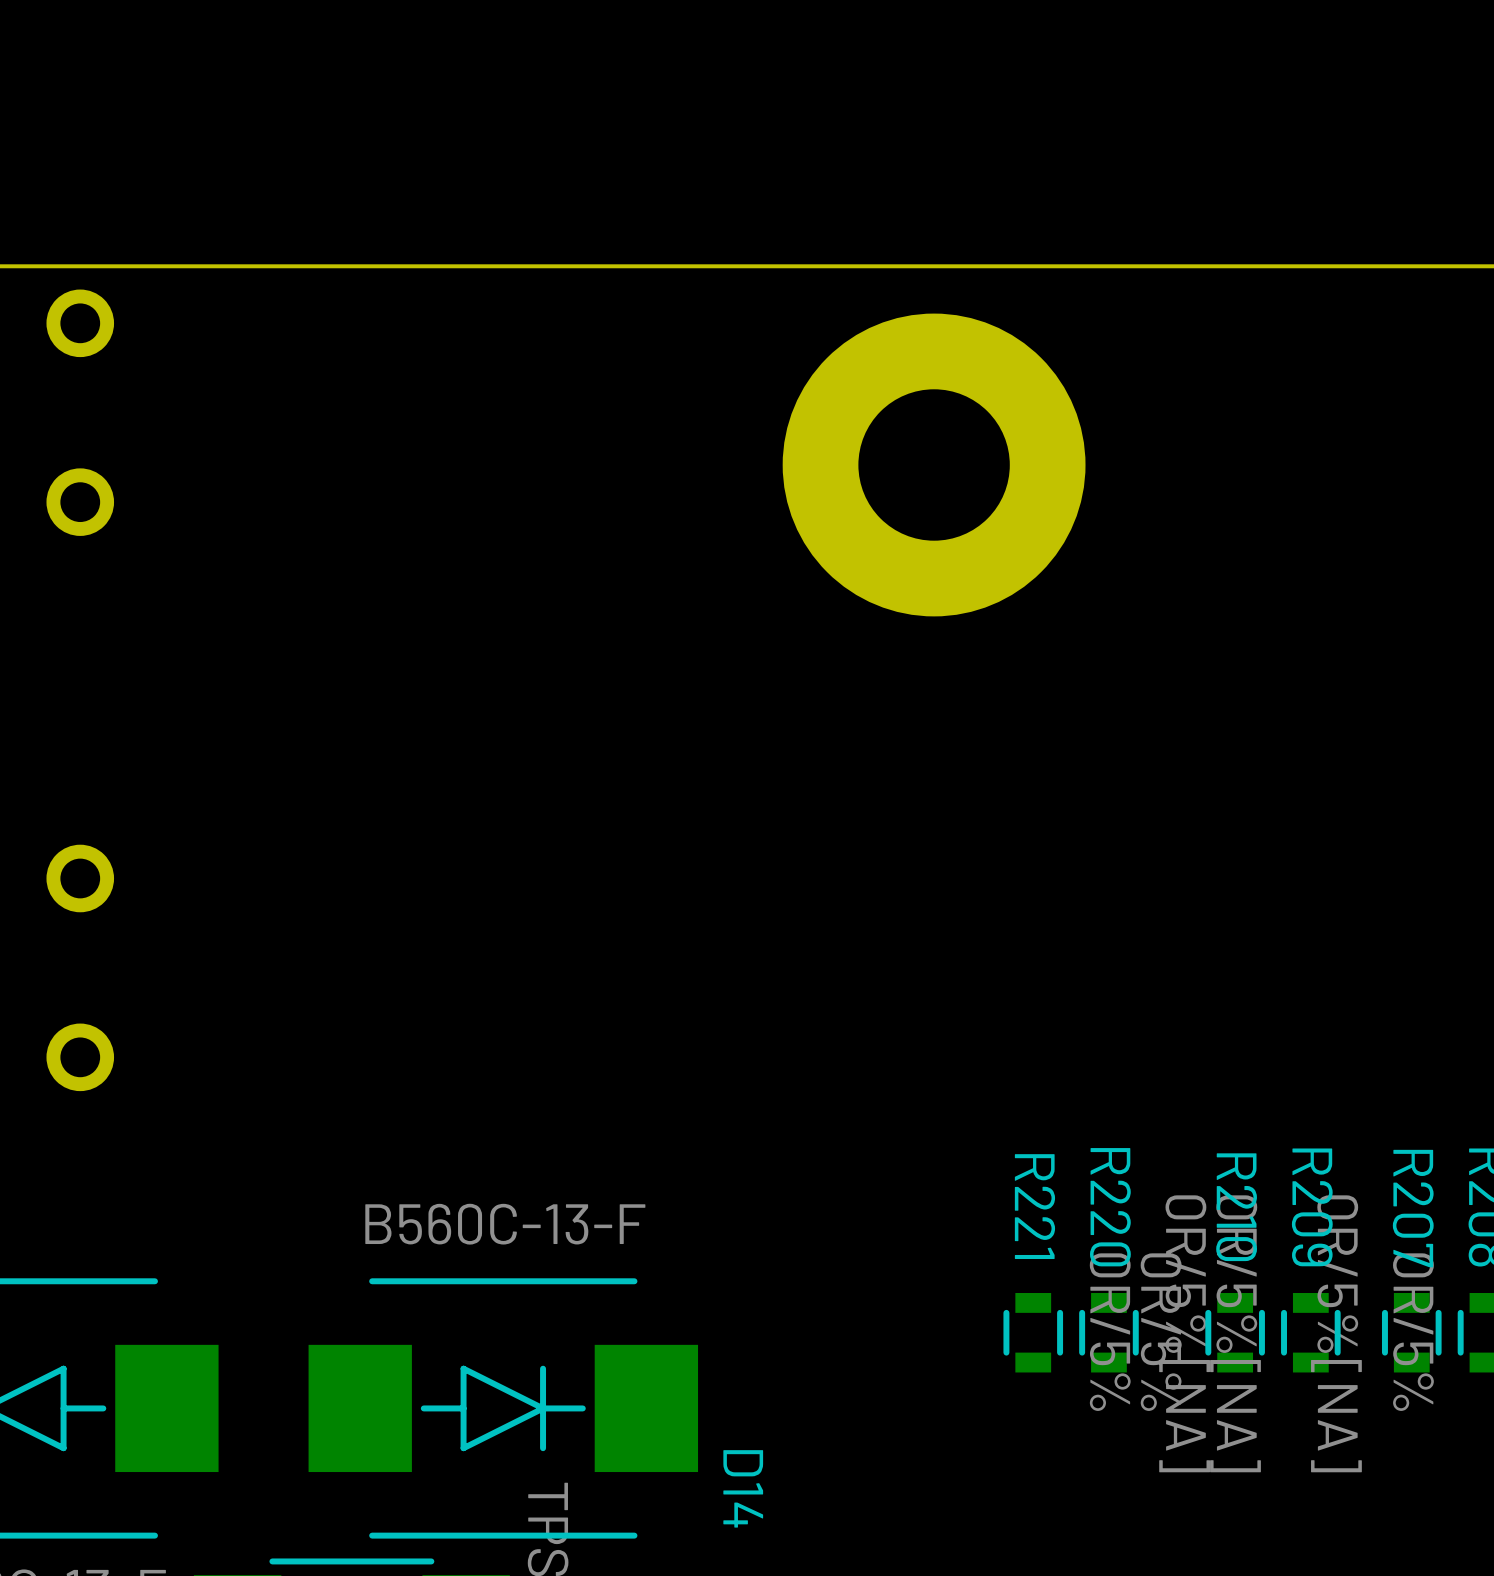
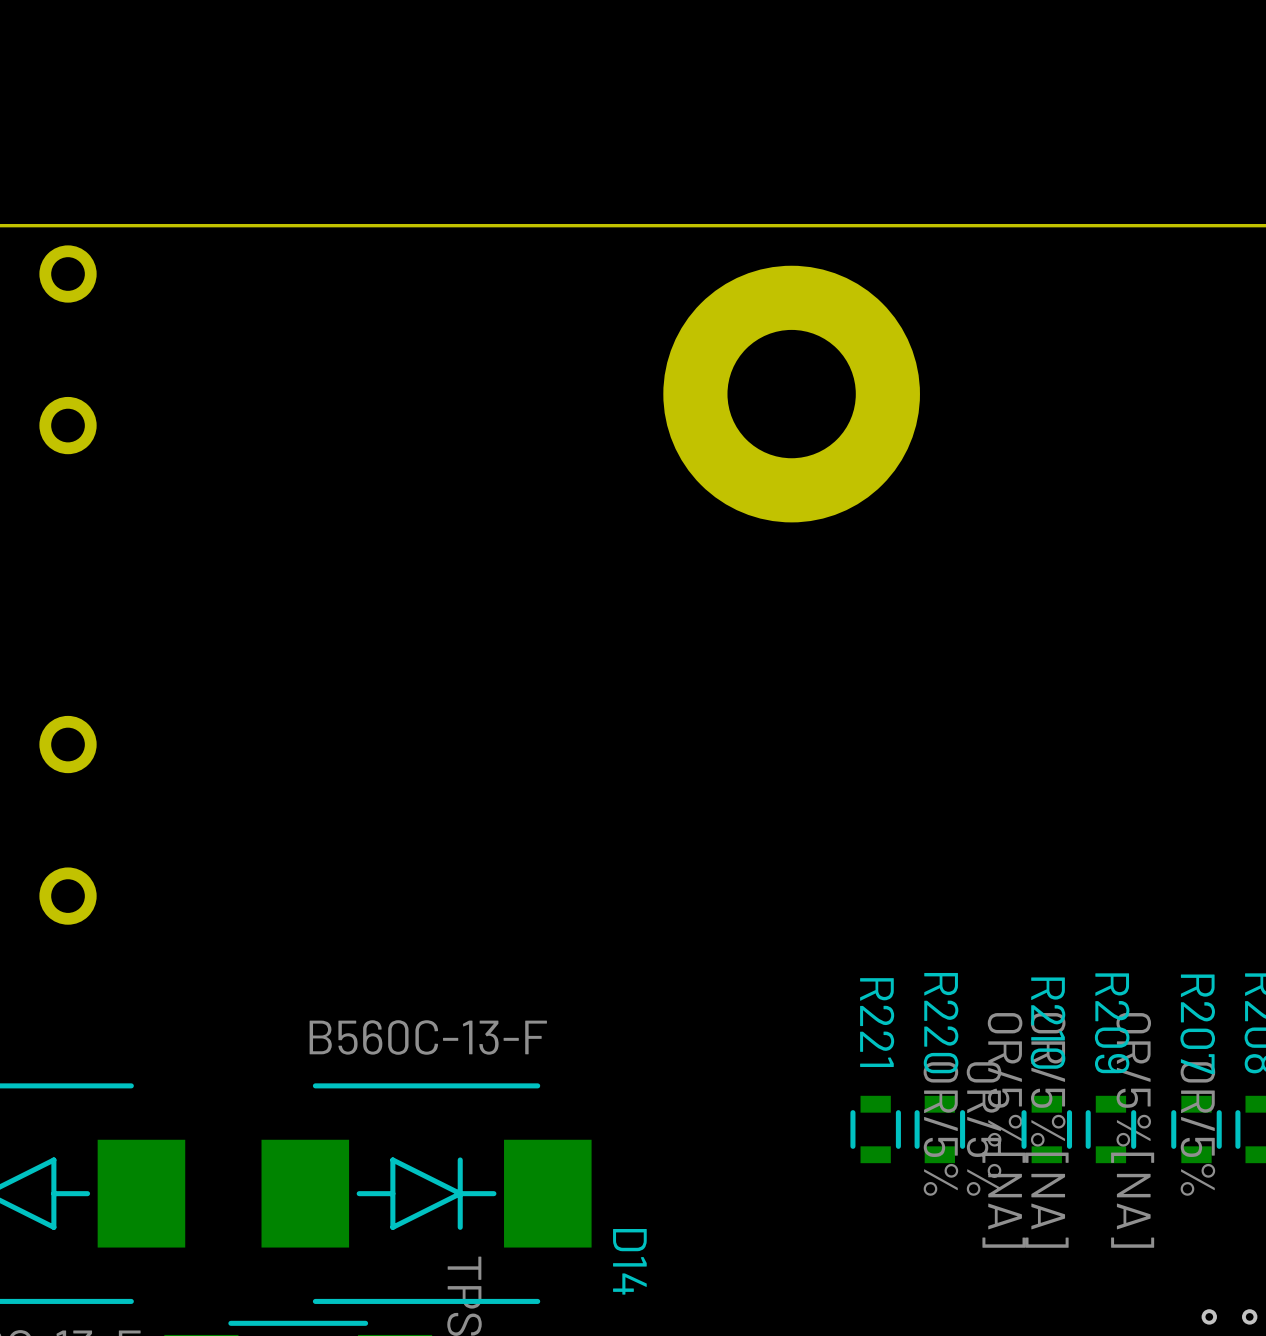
via: none -> (1209, 1316)
via: none -> (1249, 1316)

